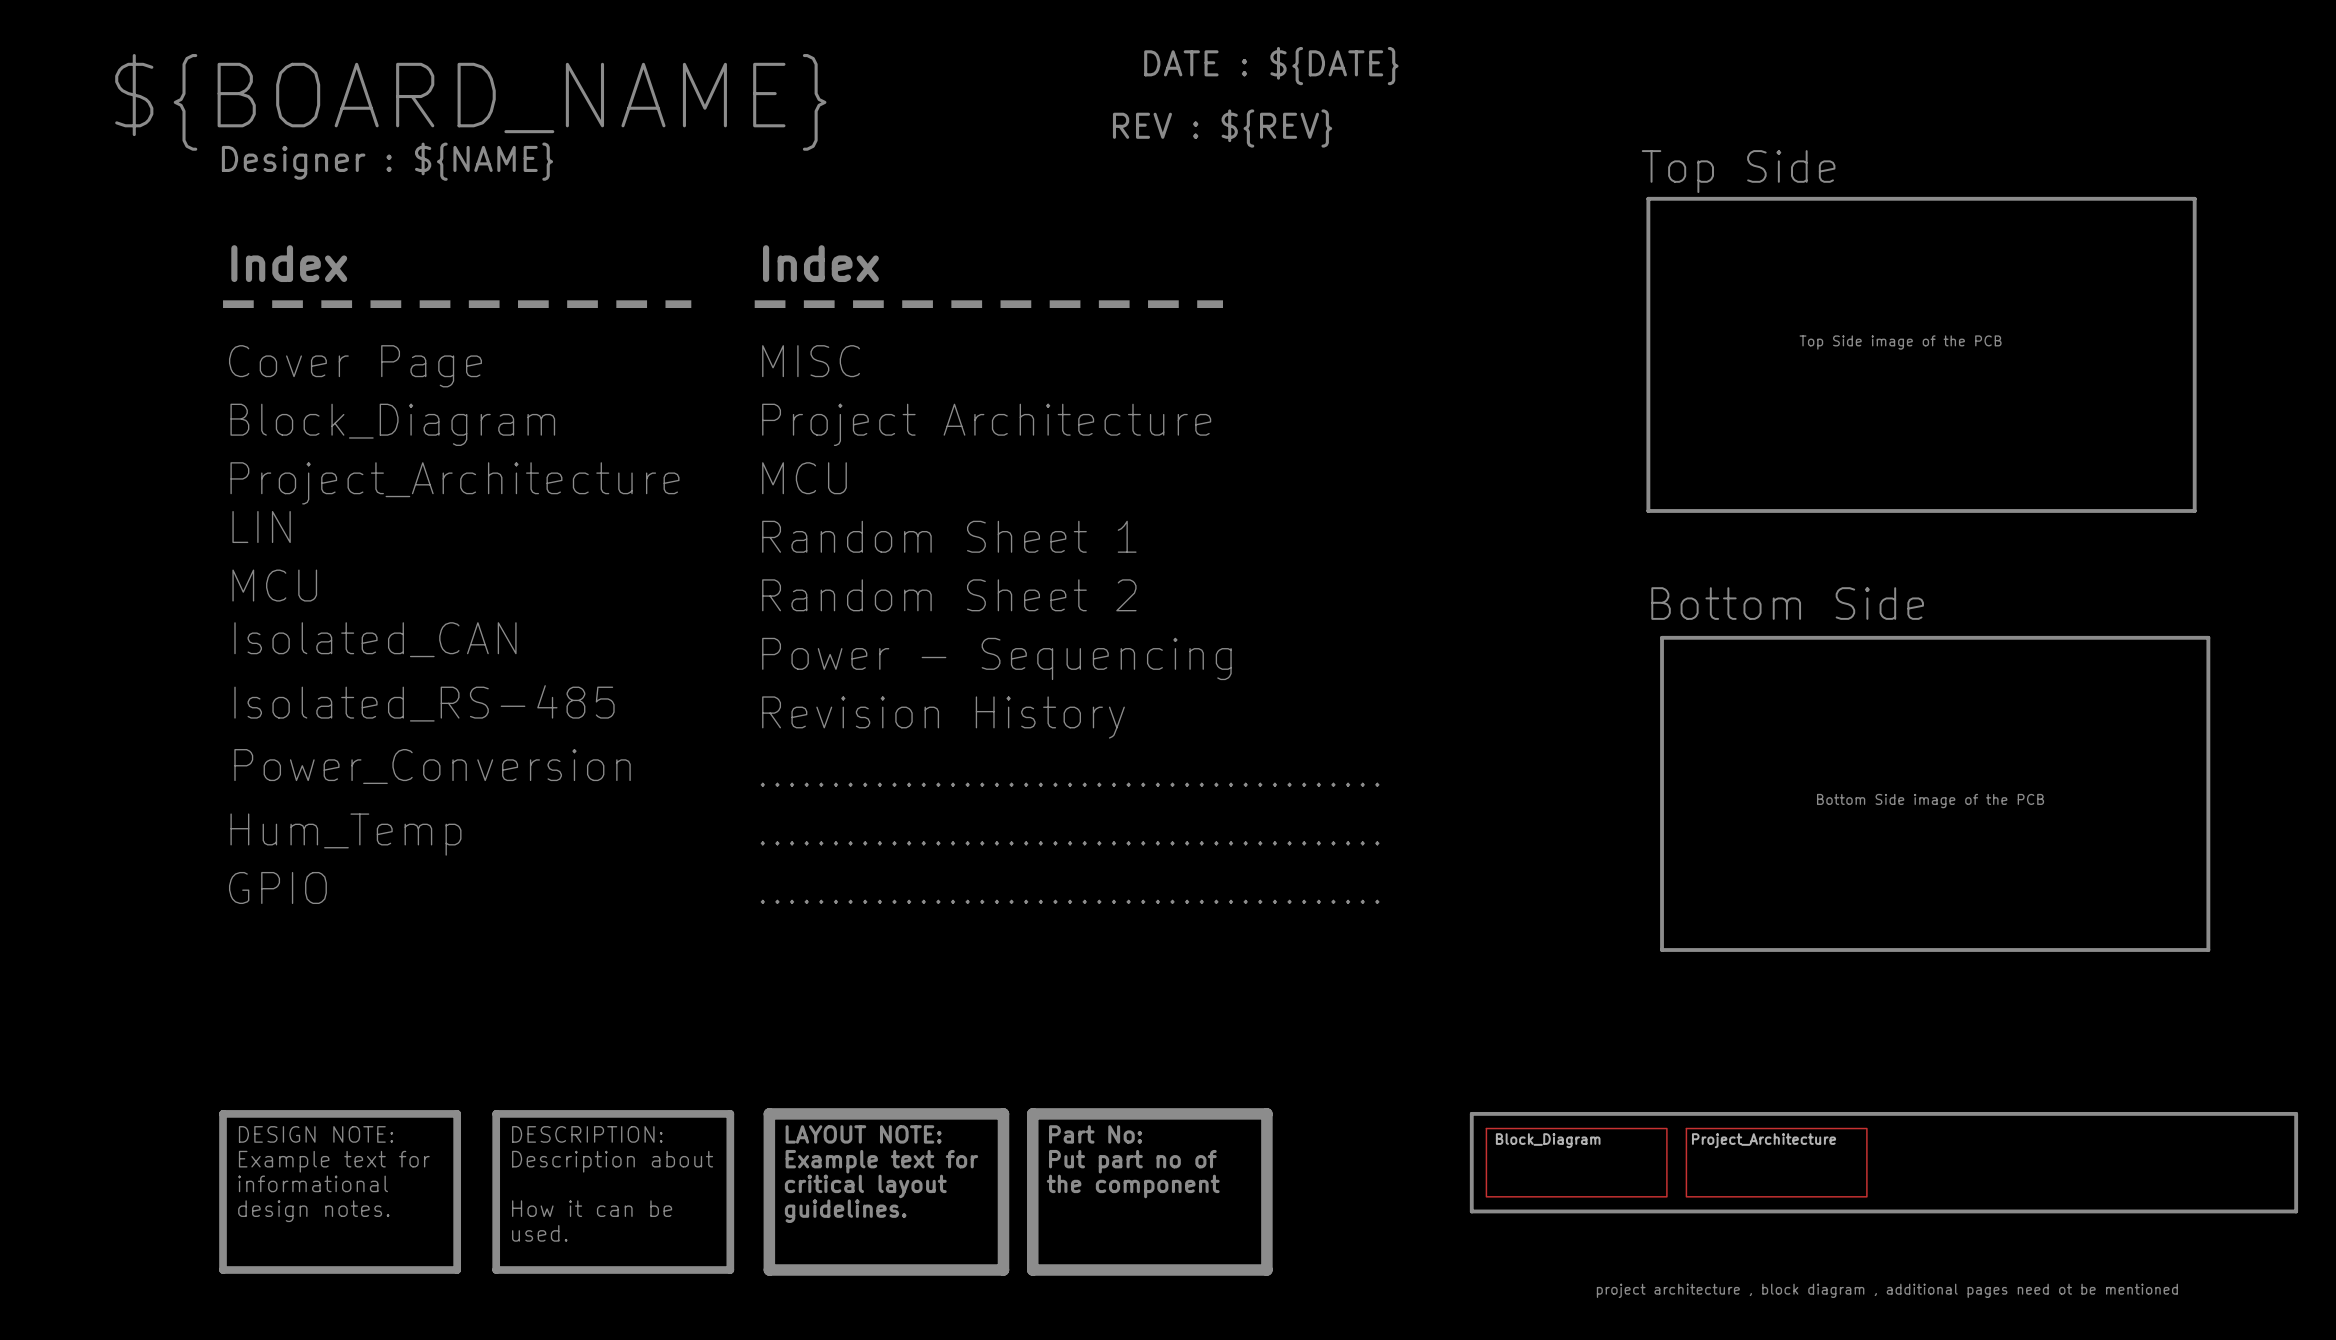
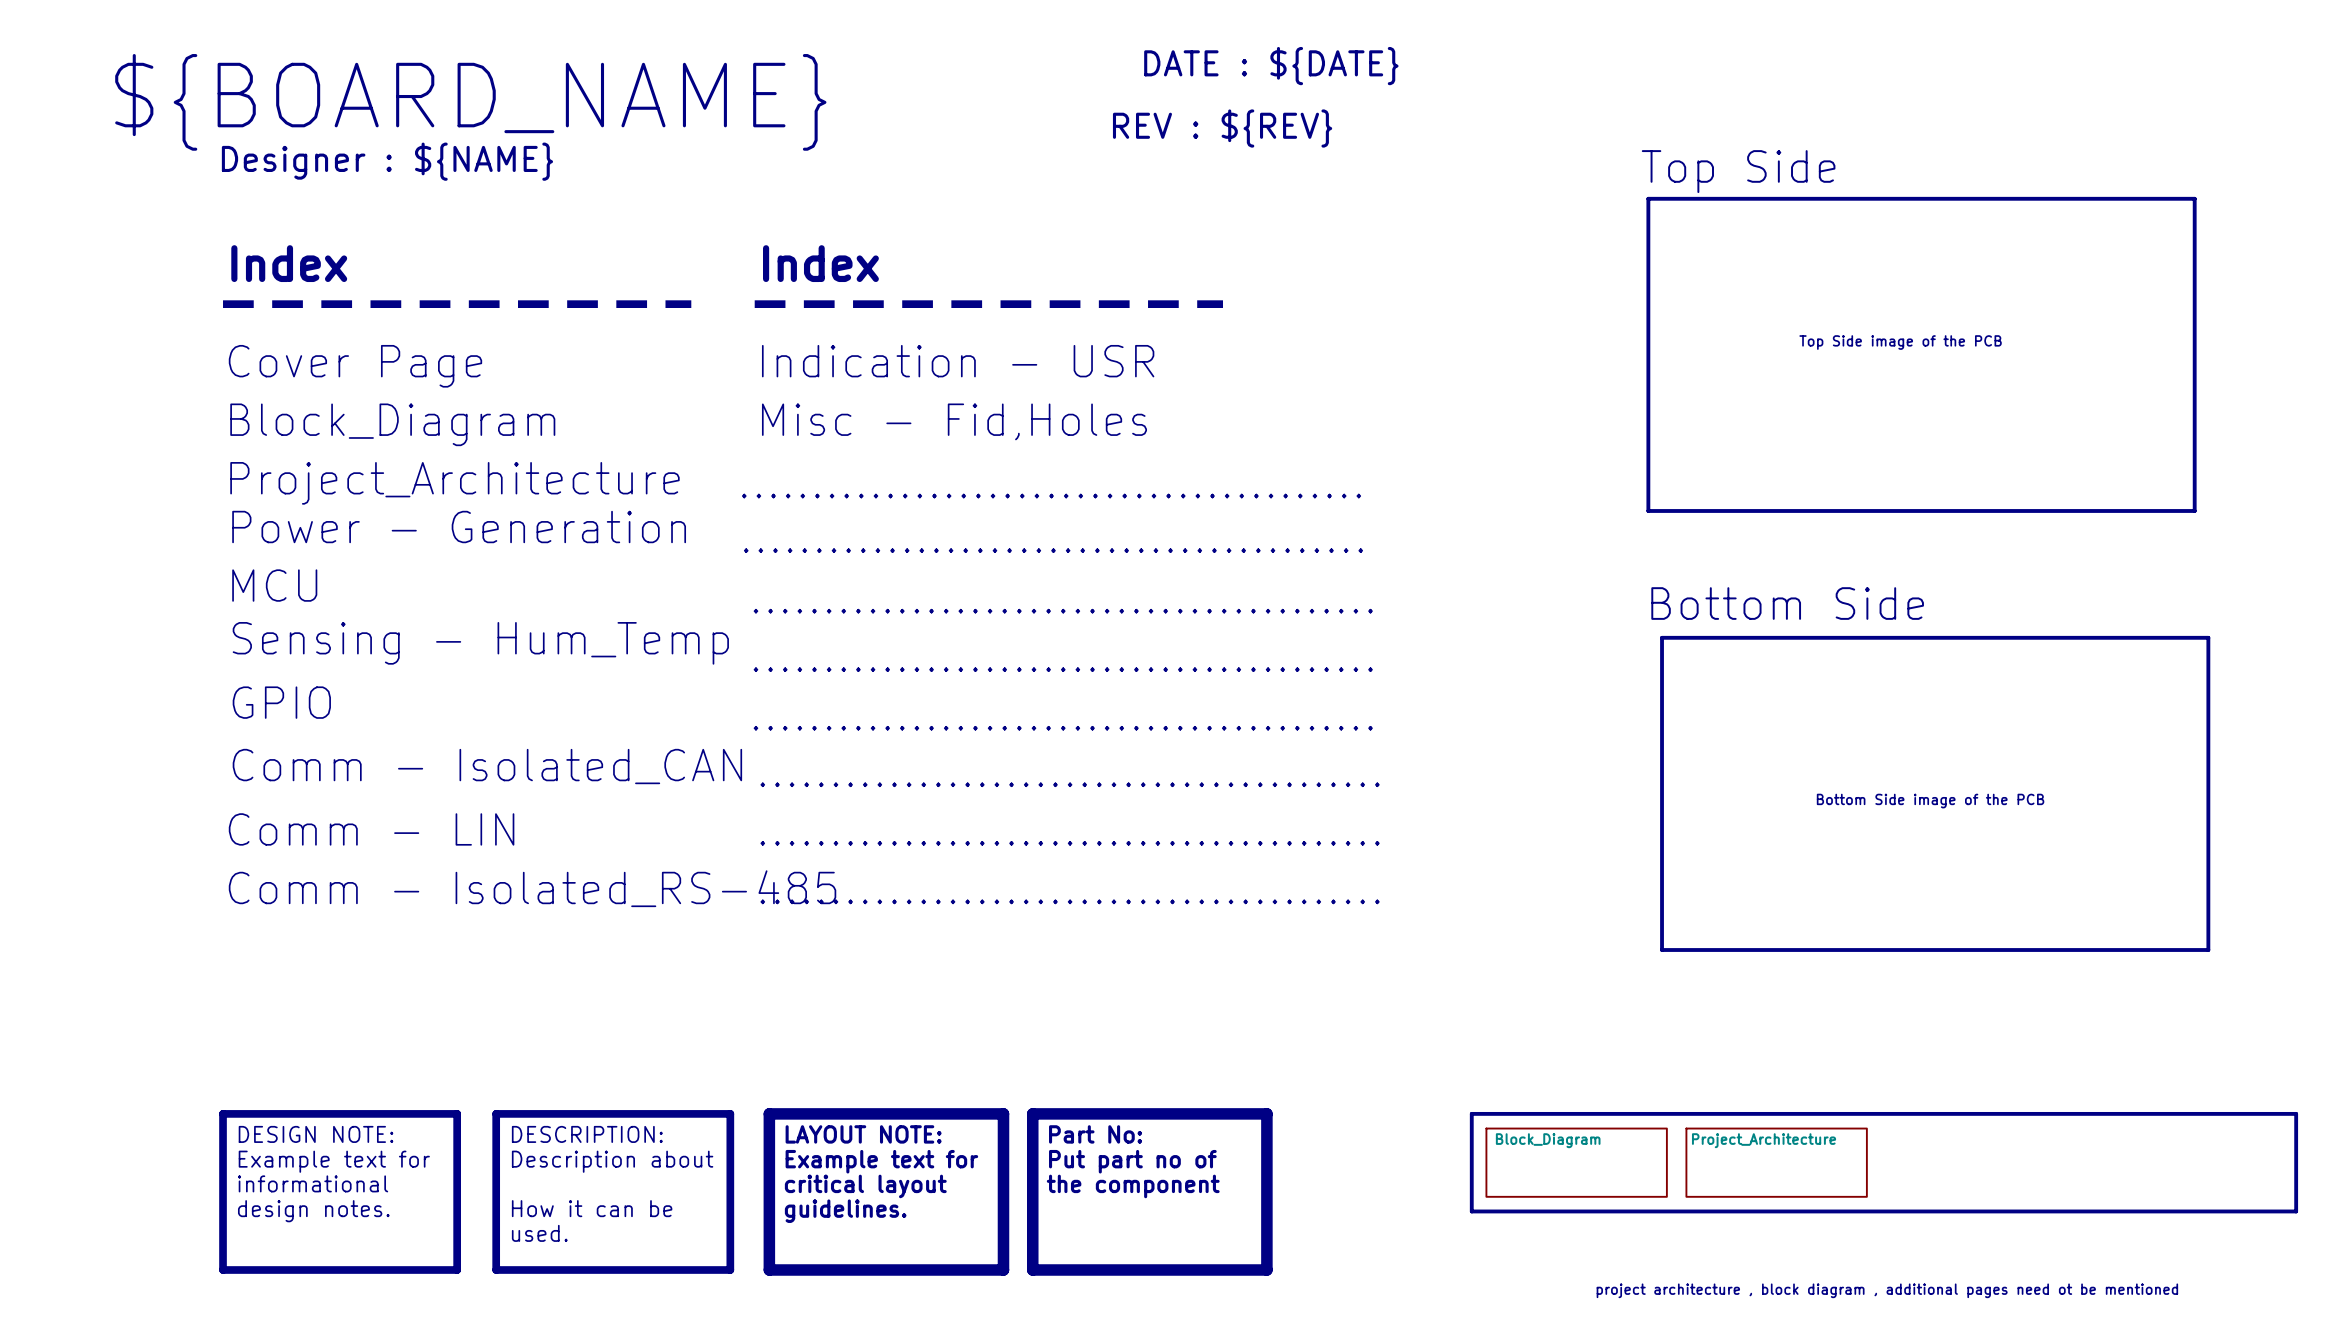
text: MISC (811, 361) -> Indication - USR (958, 361)
text: Project Architecture (986, 424) -> Misc - Fid,Holes (954, 421)
text: MCU (804, 478) -> none
text: none -> ........................................... (1051, 496)
text: LIN (261, 527) -> Power - Generation (459, 527)
text: Random Sheet 1 (949, 536) -> none
text: none -> ........................................... (1053, 550)
text: Random Sheet 2 (949, 595) -> ........................................... (1063, 611)
text: Isolated_CAN (375, 639) -> Sensing - Hum_Temp (480, 643)
text: Power - Sequencing (996, 658) -> ........................................... (1063, 669)
text: Isolated_RS-485 (424, 703) -> GPIO (281, 702)
text: Revision History (943, 717) -> ........................................... (1063, 728)
text: Power_Conversion (432, 766) -> Comm - Isolated_CAN (487, 766)
text: Hum_Temp (345, 834) -> Comm - LIN (371, 829)
text: GPIO (277, 887) -> Comm - Isolated_RS-485 (532, 888)

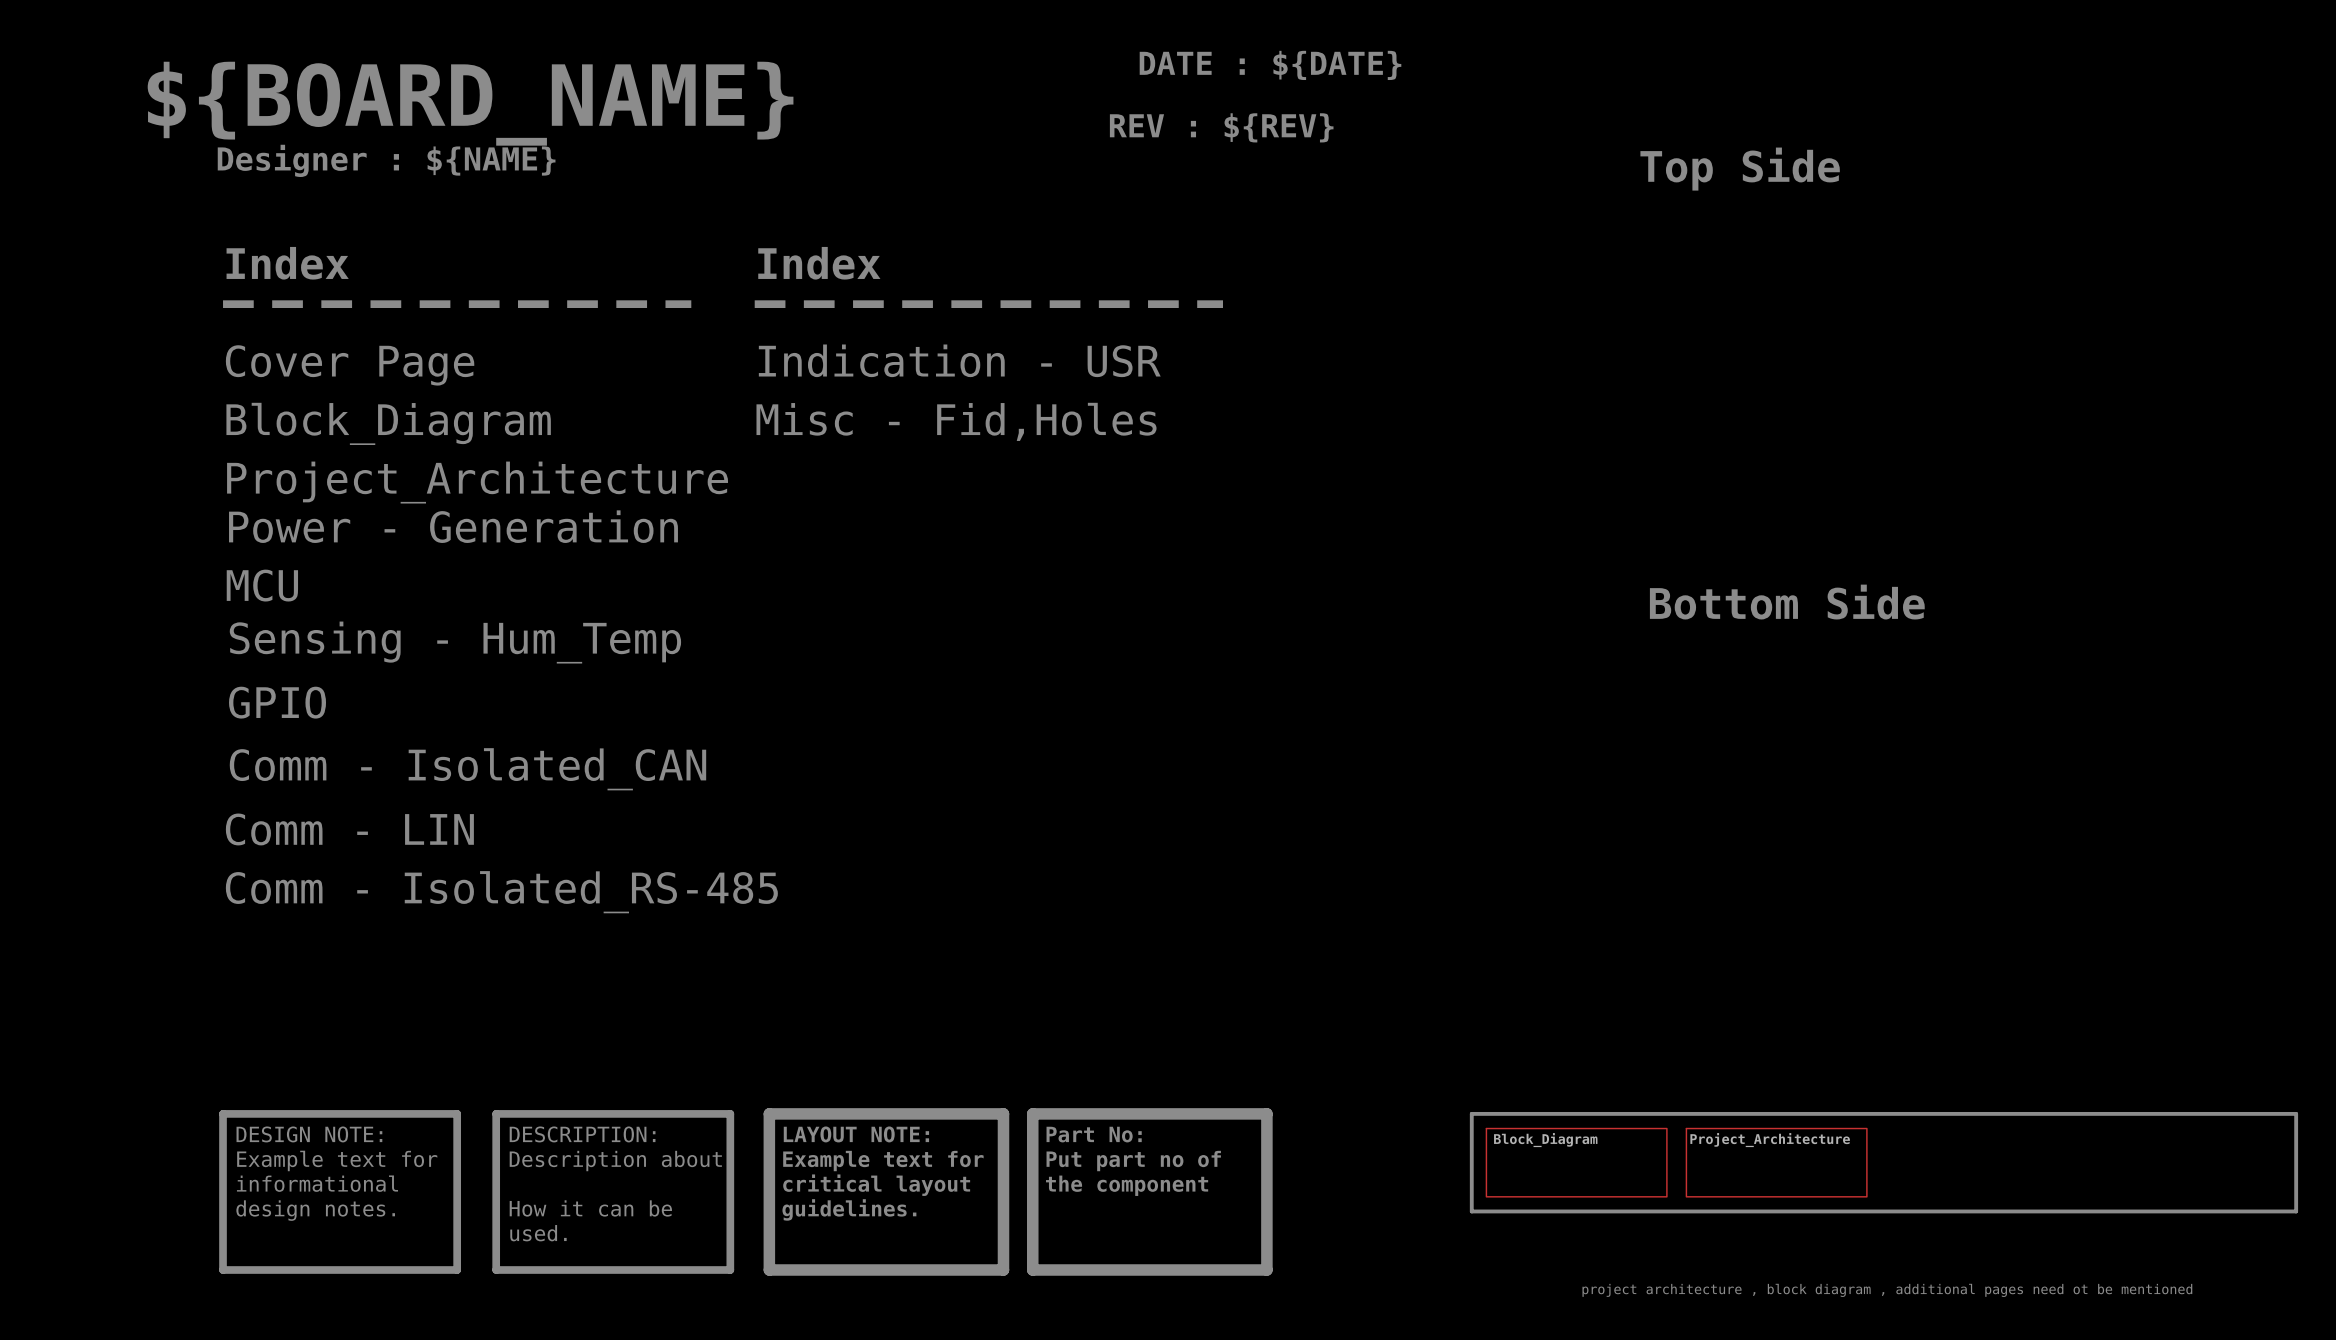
line: (1648, 198) (2194, 198) (2194, 510) (1648, 510) (1648, 198) -> none
text: Top Side image of the PCB (1900, 342) -> none
text: ........................................... (1051, 496) -> none
text: ........................................... (1053, 550) -> none
text: ........................................... (1063, 611) -> none
line: (1662, 637) (2208, 637) (2208, 950) (1662, 950) (1662, 637) -> none
text: ........................................... (1063, 669) -> none
text: ........................................... (1063, 728) -> none
text: ........................................... (1070, 784) -> none
text: Bottom Side image of the PCB (1930, 801) -> none
text: ........................................... (1070, 843) -> none
text: ........................................... (1070, 901) -> none

